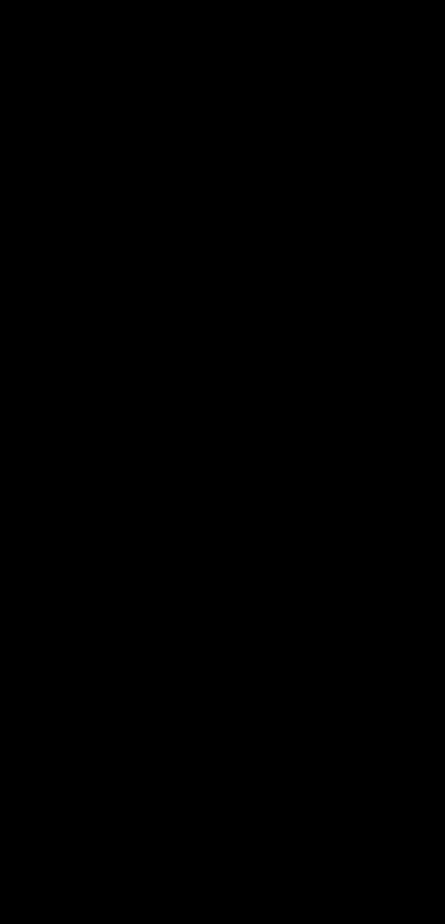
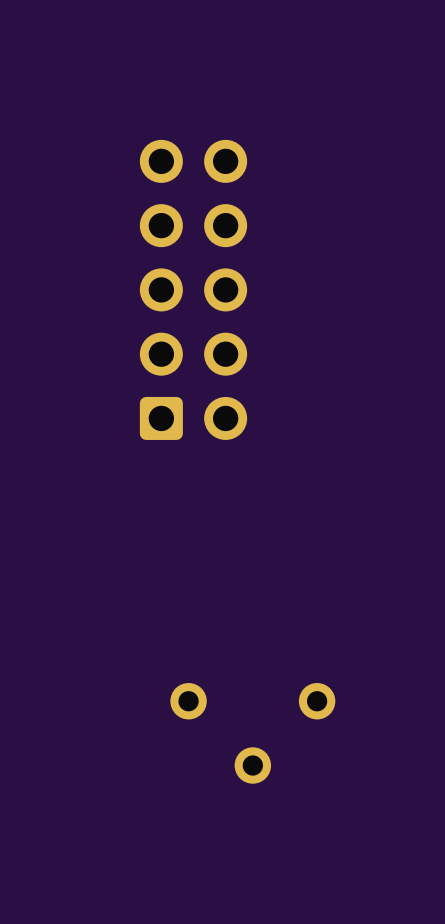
part: none -> (193, 289)
part: none -> (252, 733)

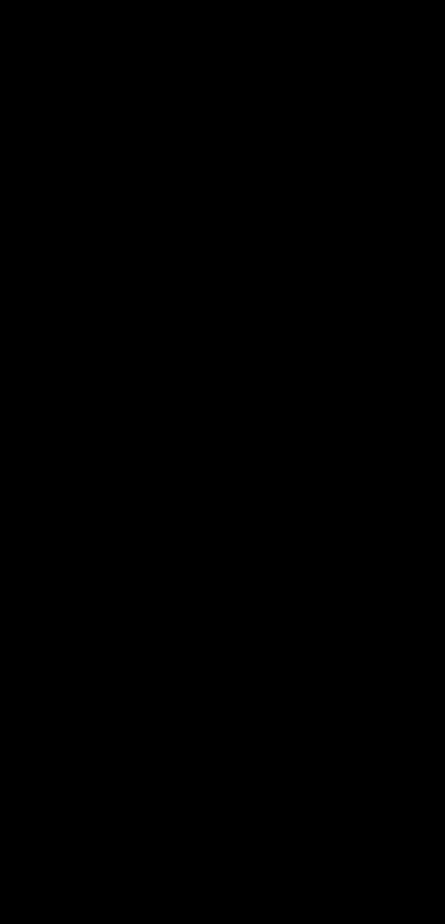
part: (193, 289) -> none
part: (252, 733) -> none

